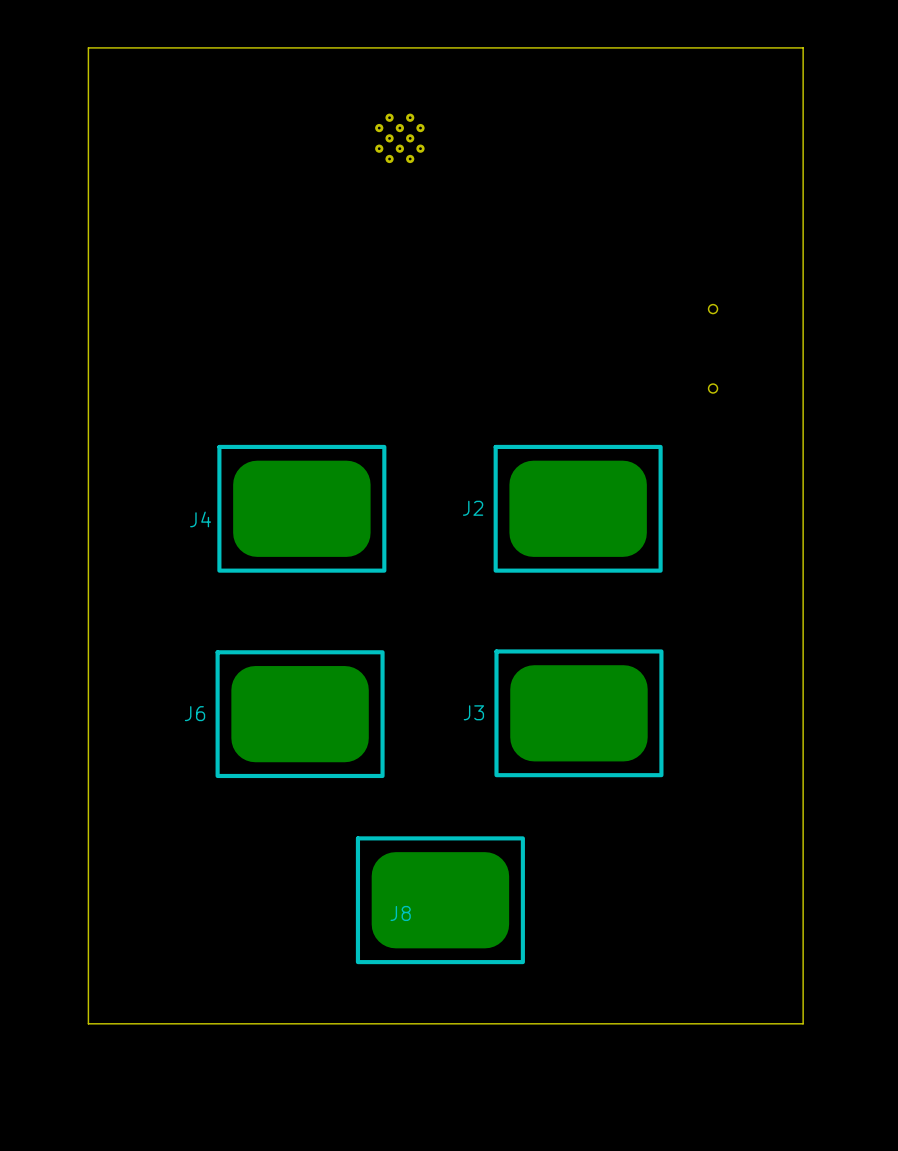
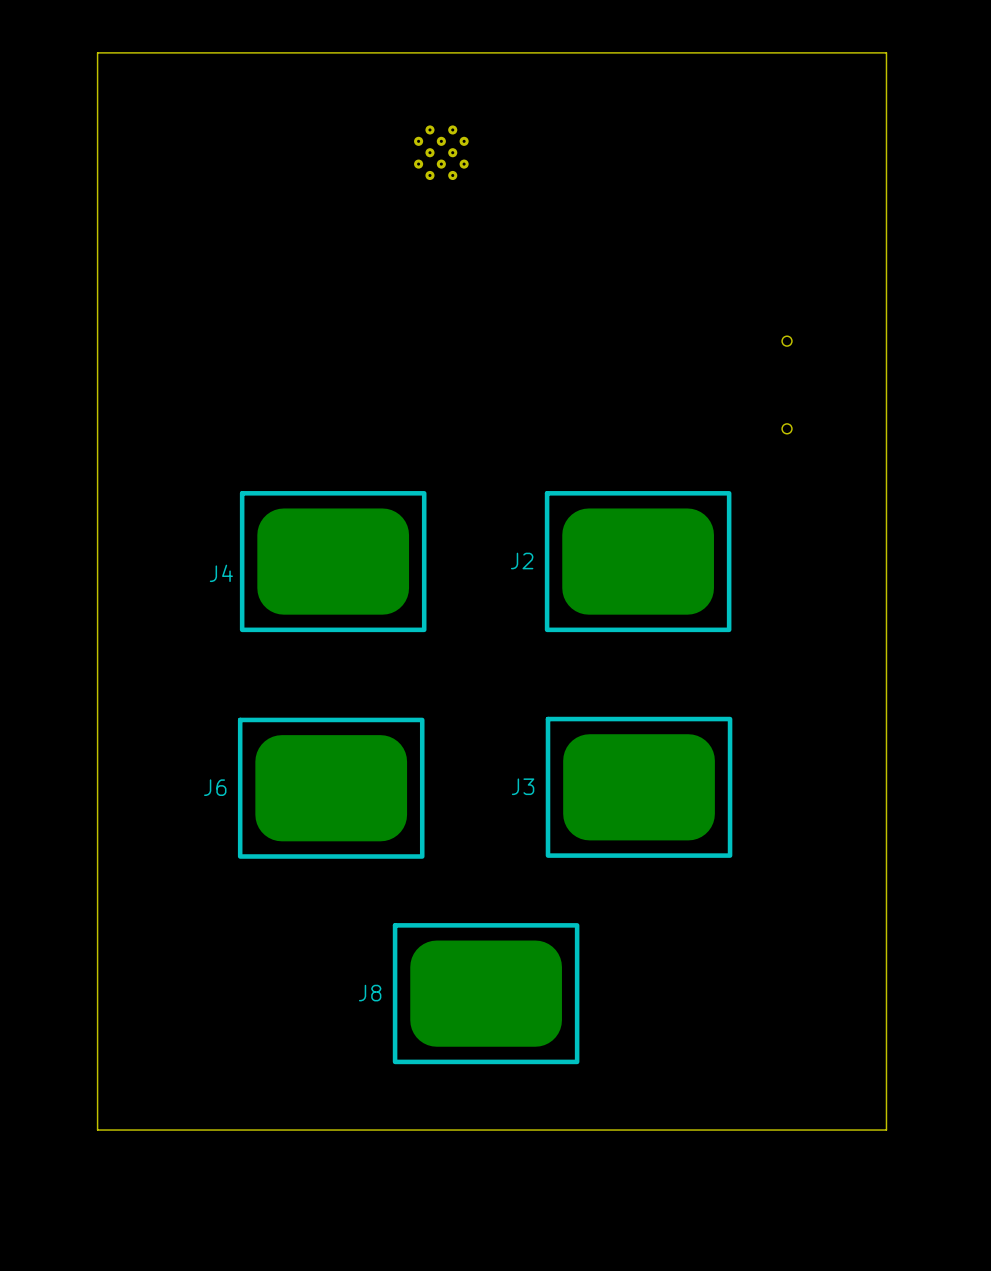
J8 name position: J8 (400, 913) -> J8 (370, 993)

